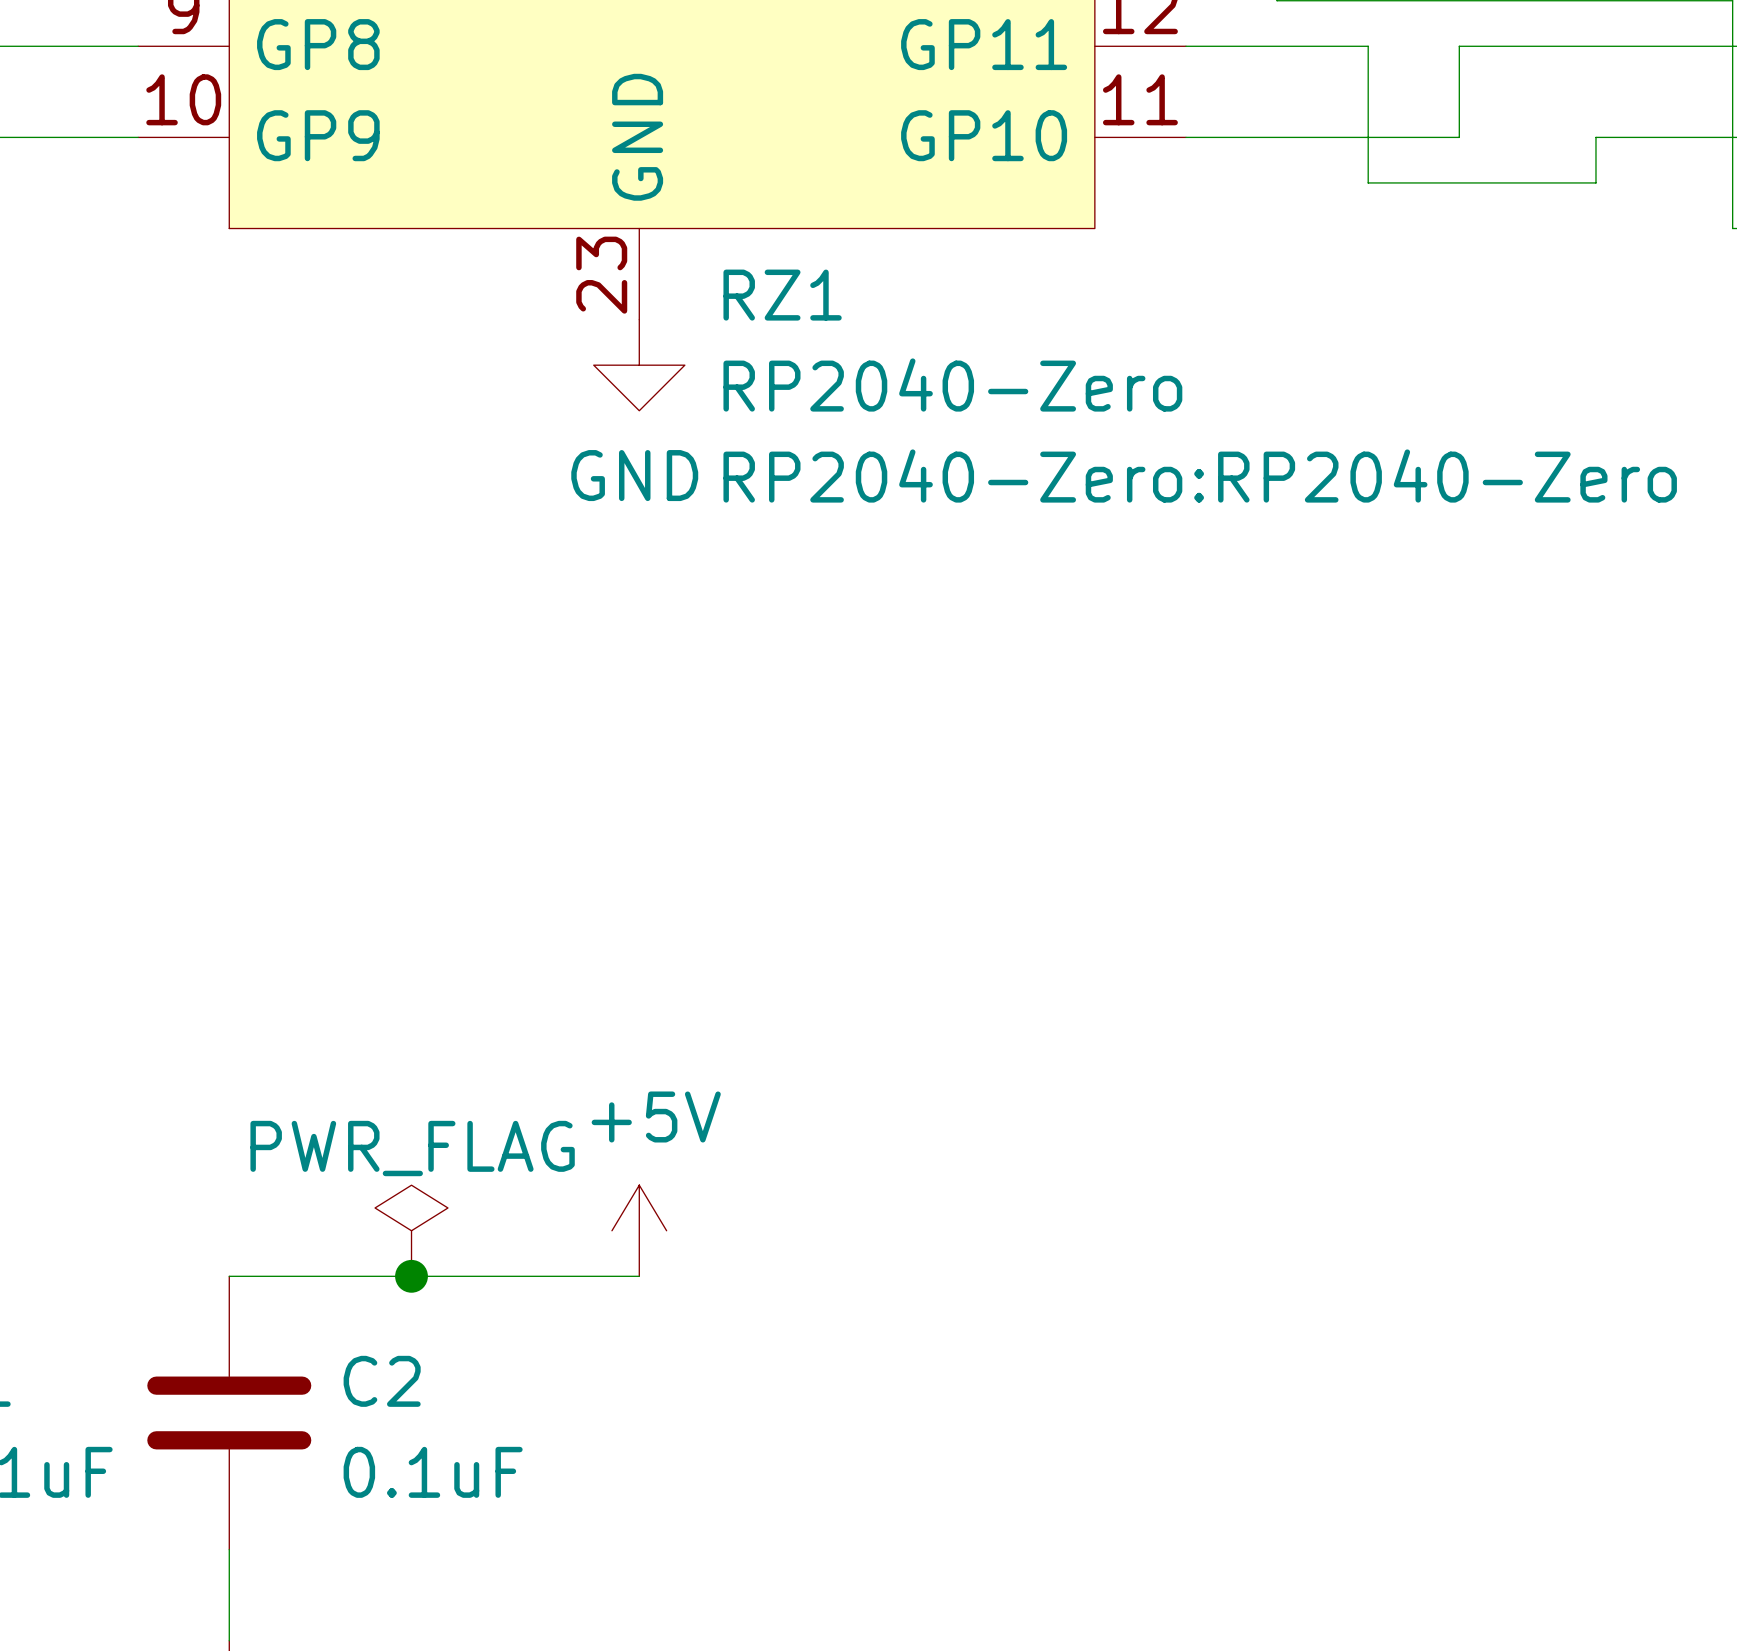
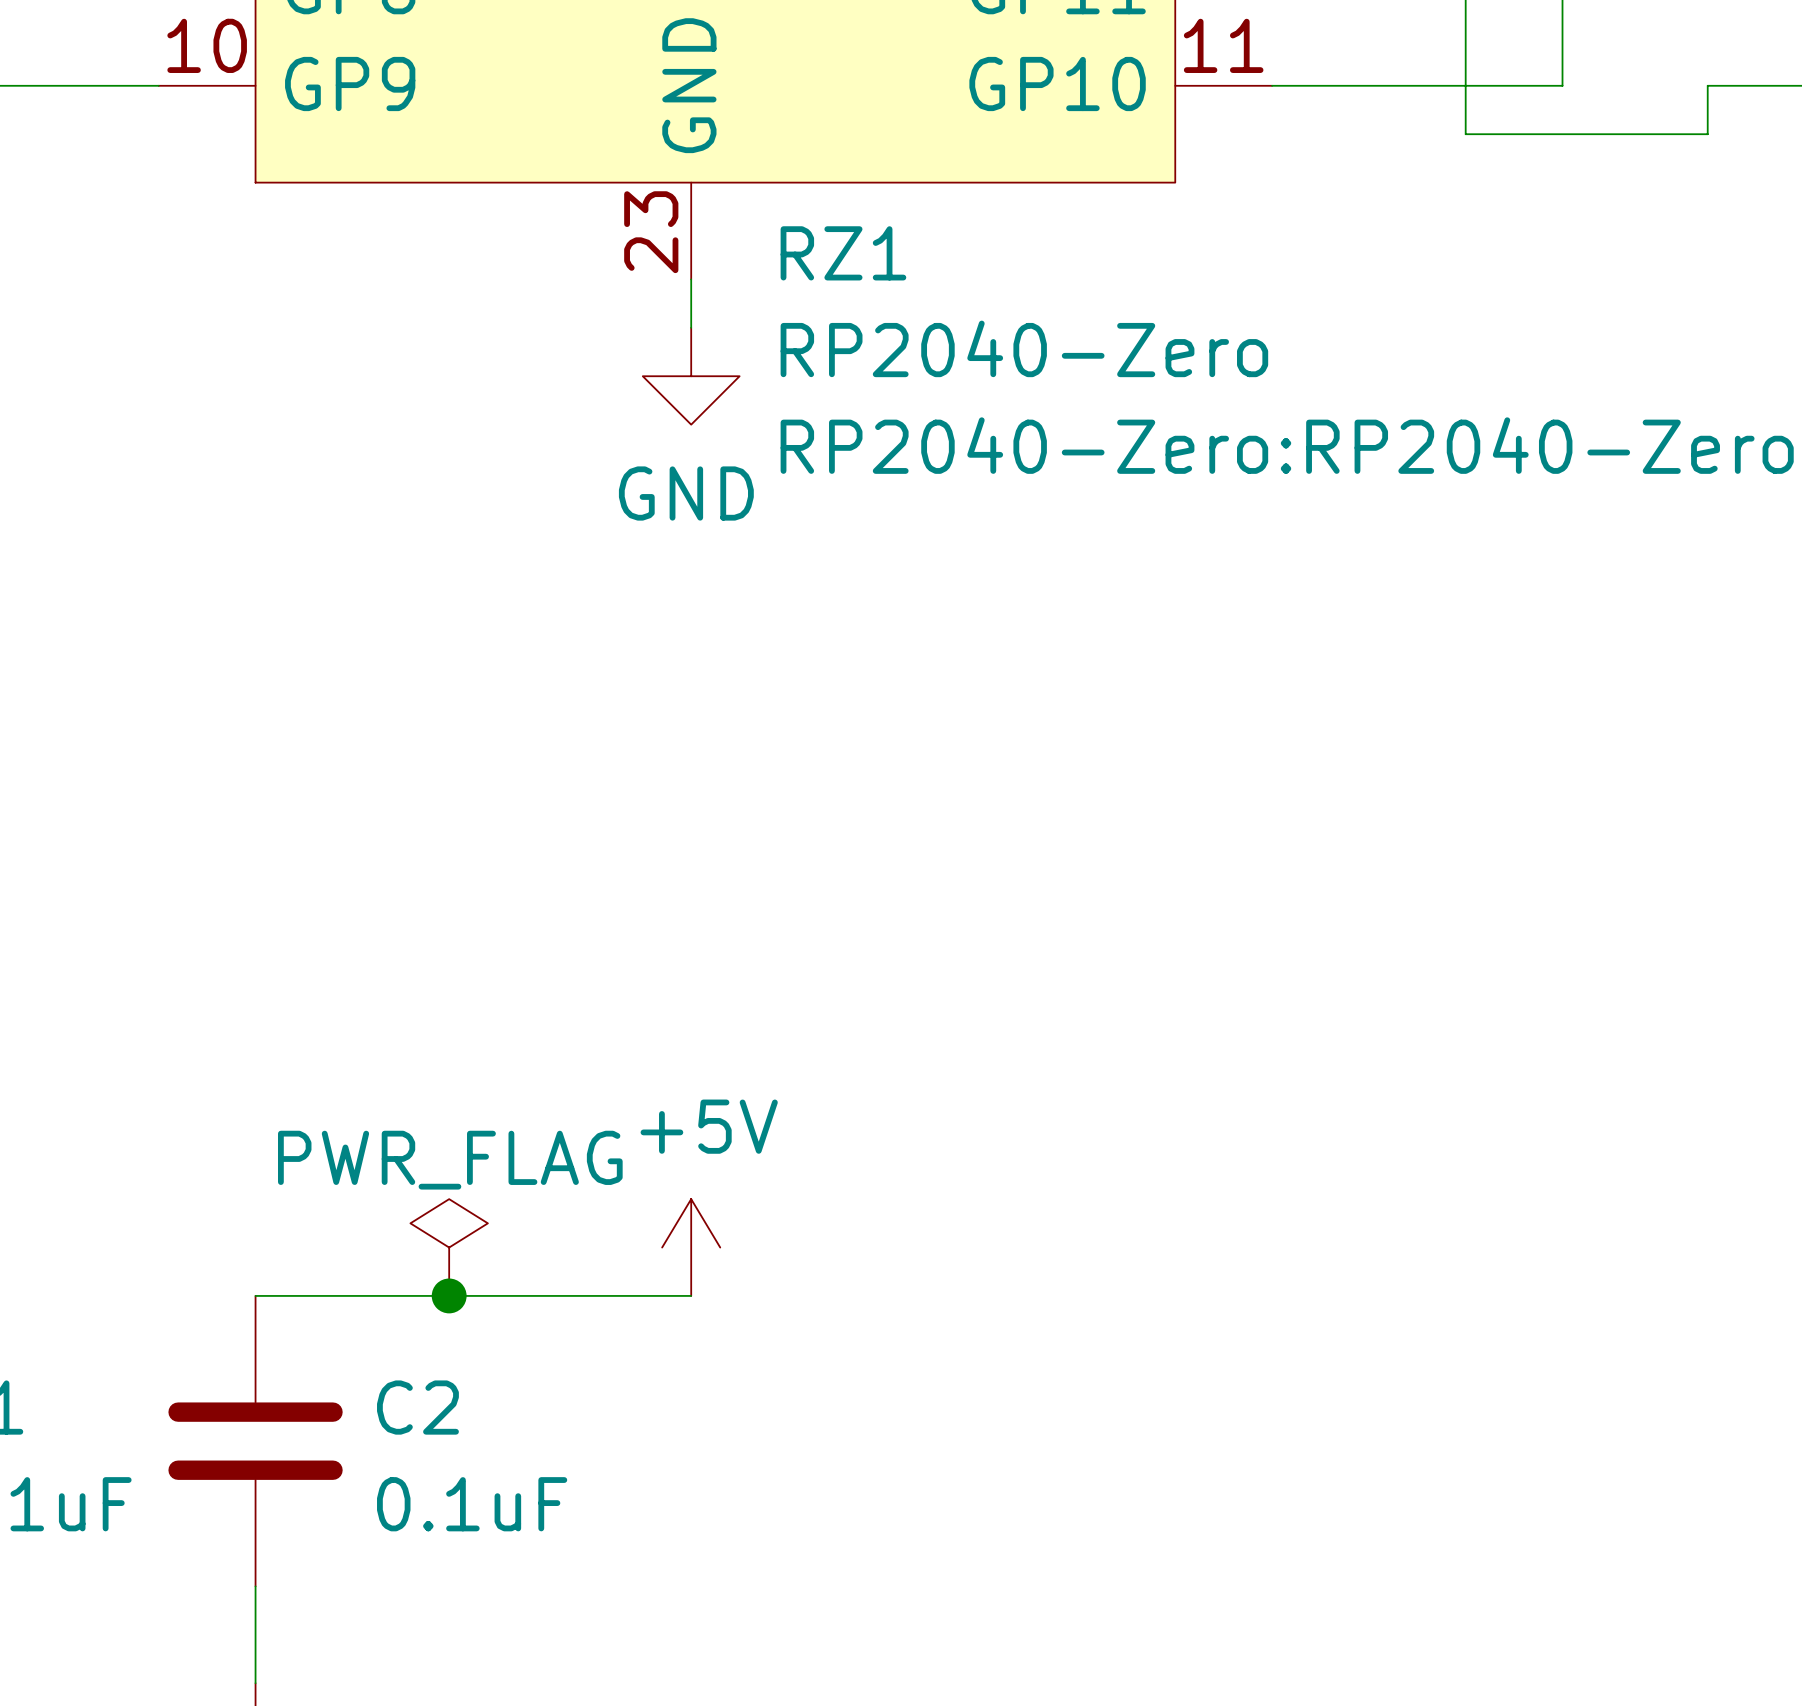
power symbol position: GND (639, 365) -> GND (691, 376)

